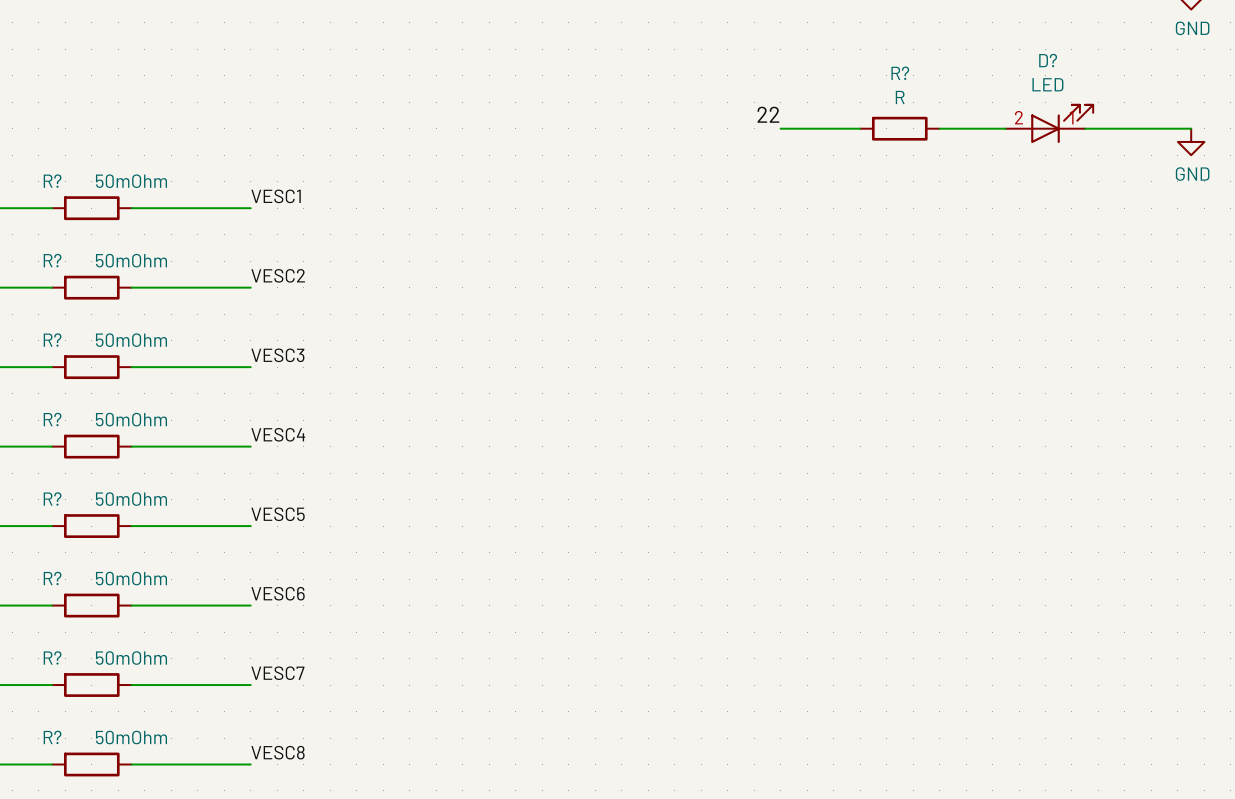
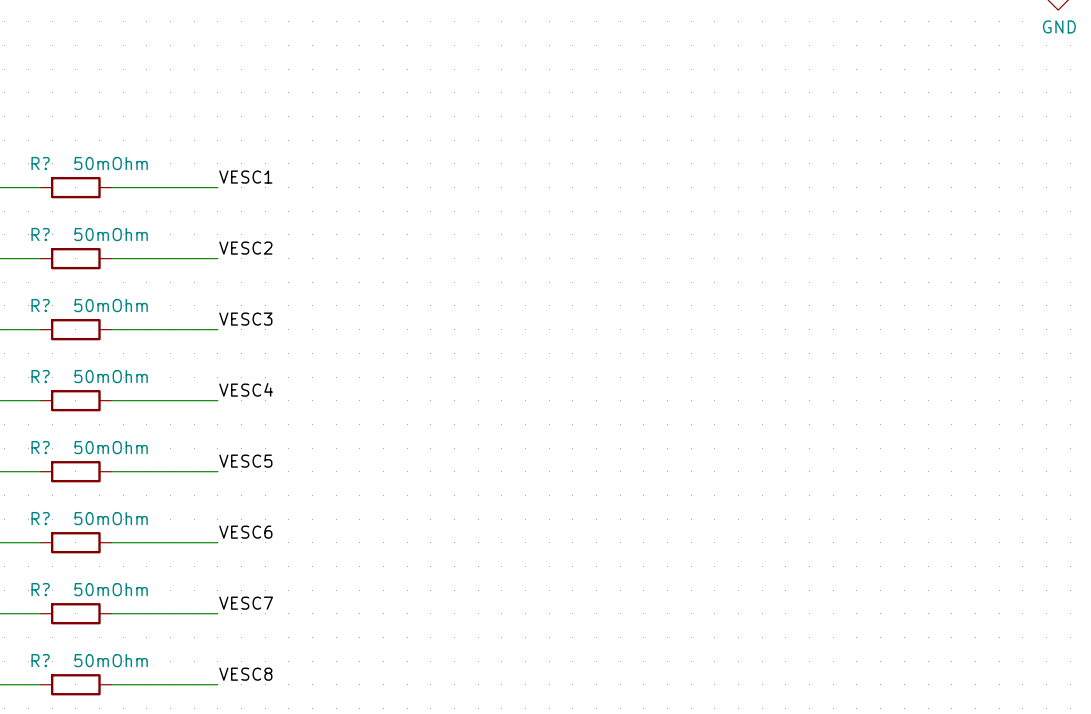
label: 22 (768, 114) -> none
D?: LED (1049, 123) -> none
wire: (780, 128) (860, 128) -> none
R?: R (899, 128) -> none
wire: (939, 128) (1005, 128) -> none
wire: (1085, 128) (1191, 128) -> none
power symbol: GND (1191, 141) -> none

